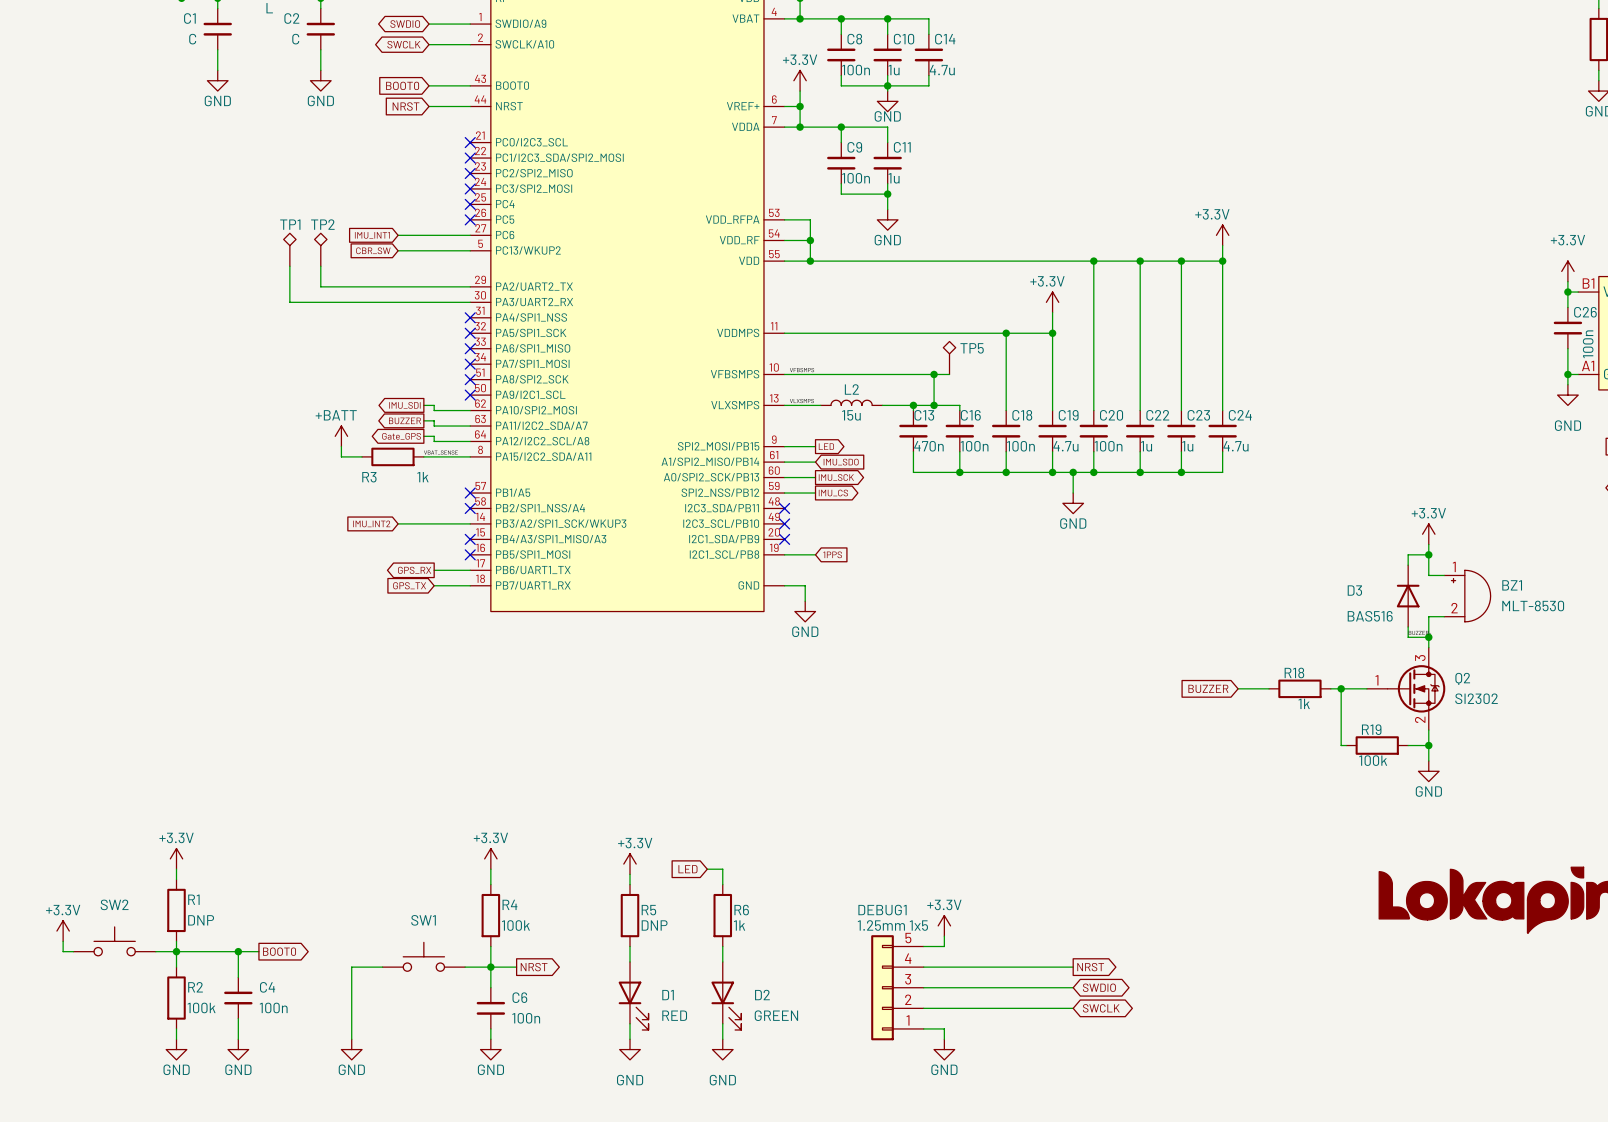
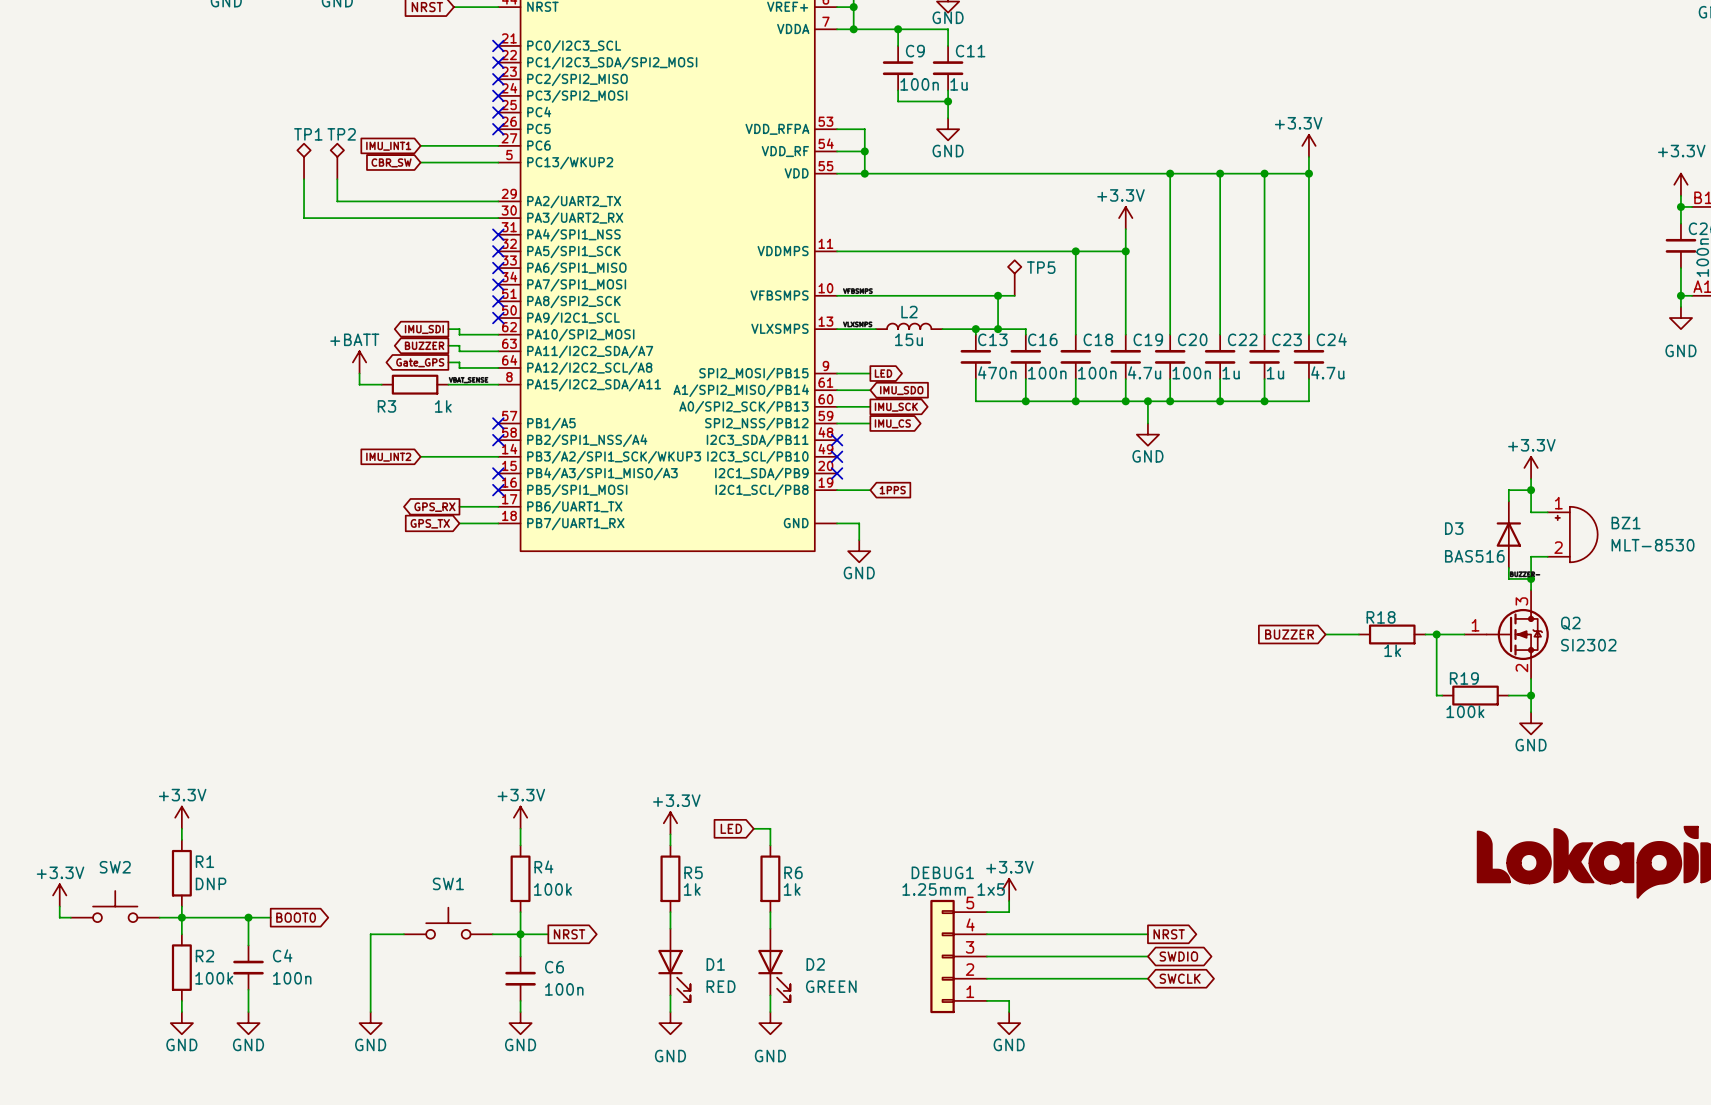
R5 value: DNP (654, 925) -> 1k (692, 889)

